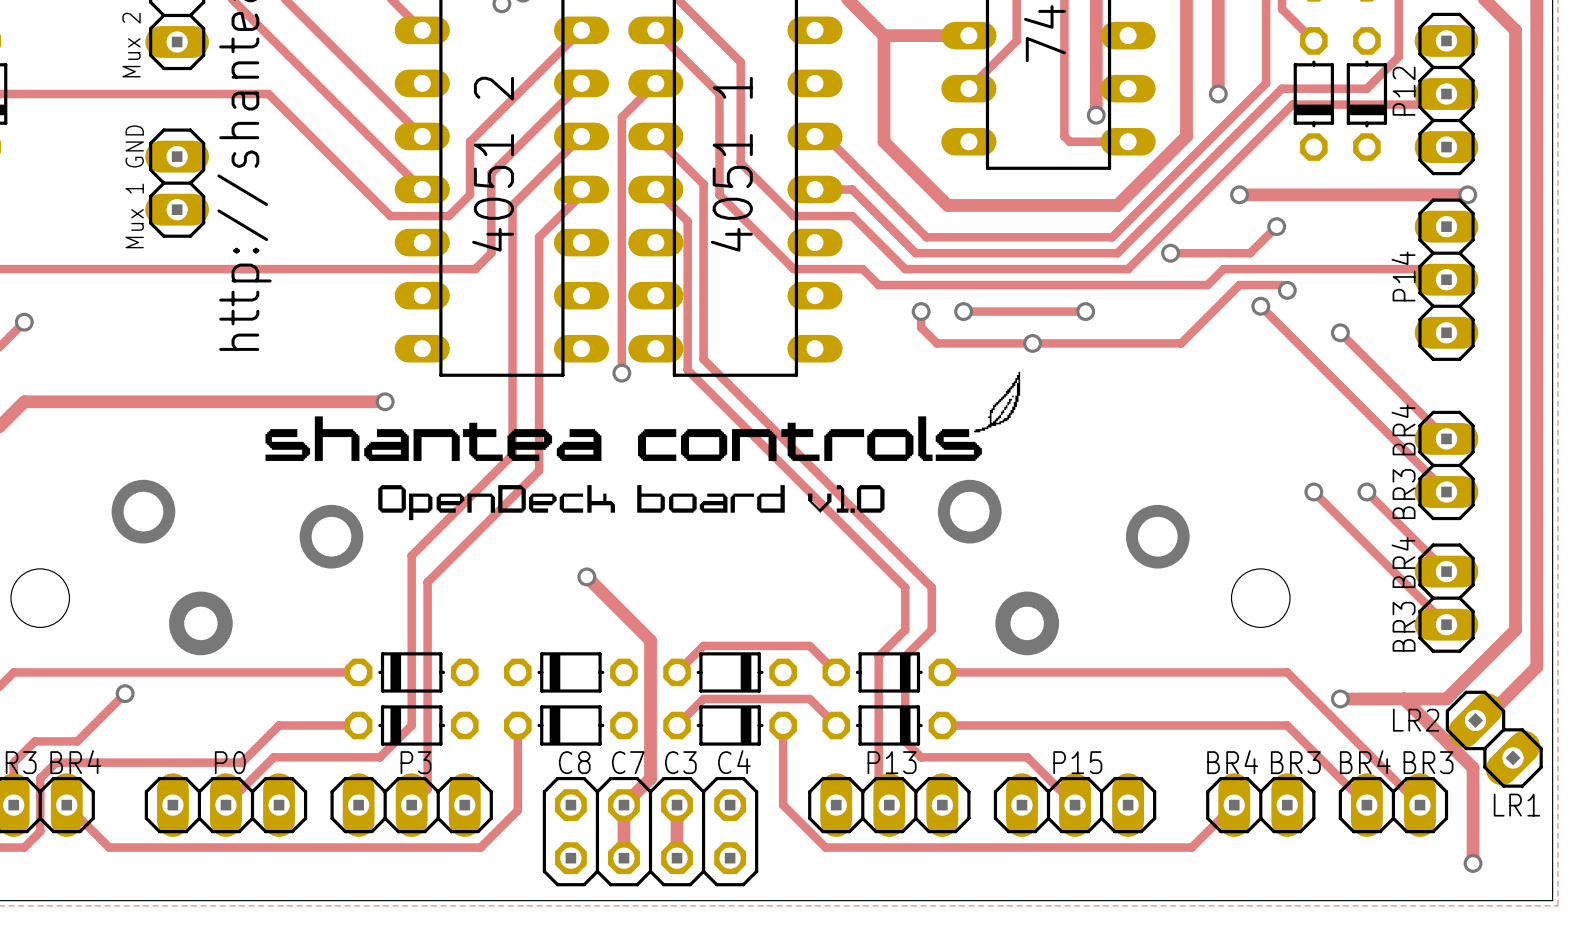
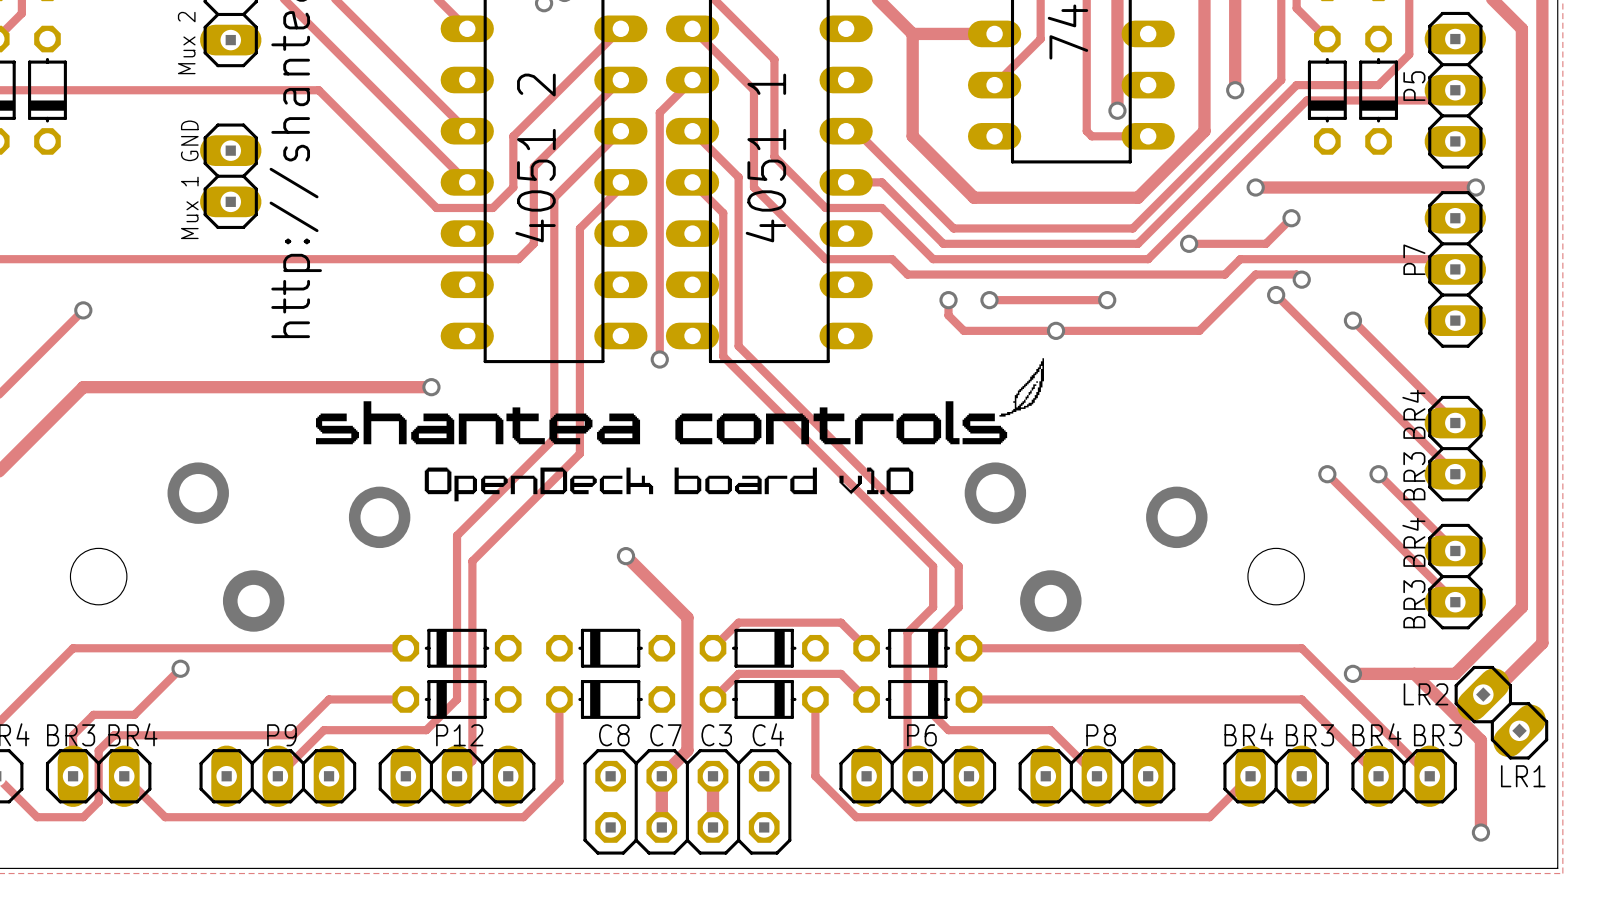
text: P12 (1404, 91) -> P5 (1414, 86)
text: P14 (1403, 276) -> P7 (1414, 259)
text: P0 (230, 762) -> P9 (282, 735)
text: P3 (416, 762) -> P12 (459, 735)
text: P13 (892, 762) -> P6 (921, 735)
text: P15 (1077, 762) -> P8 (1101, 735)

